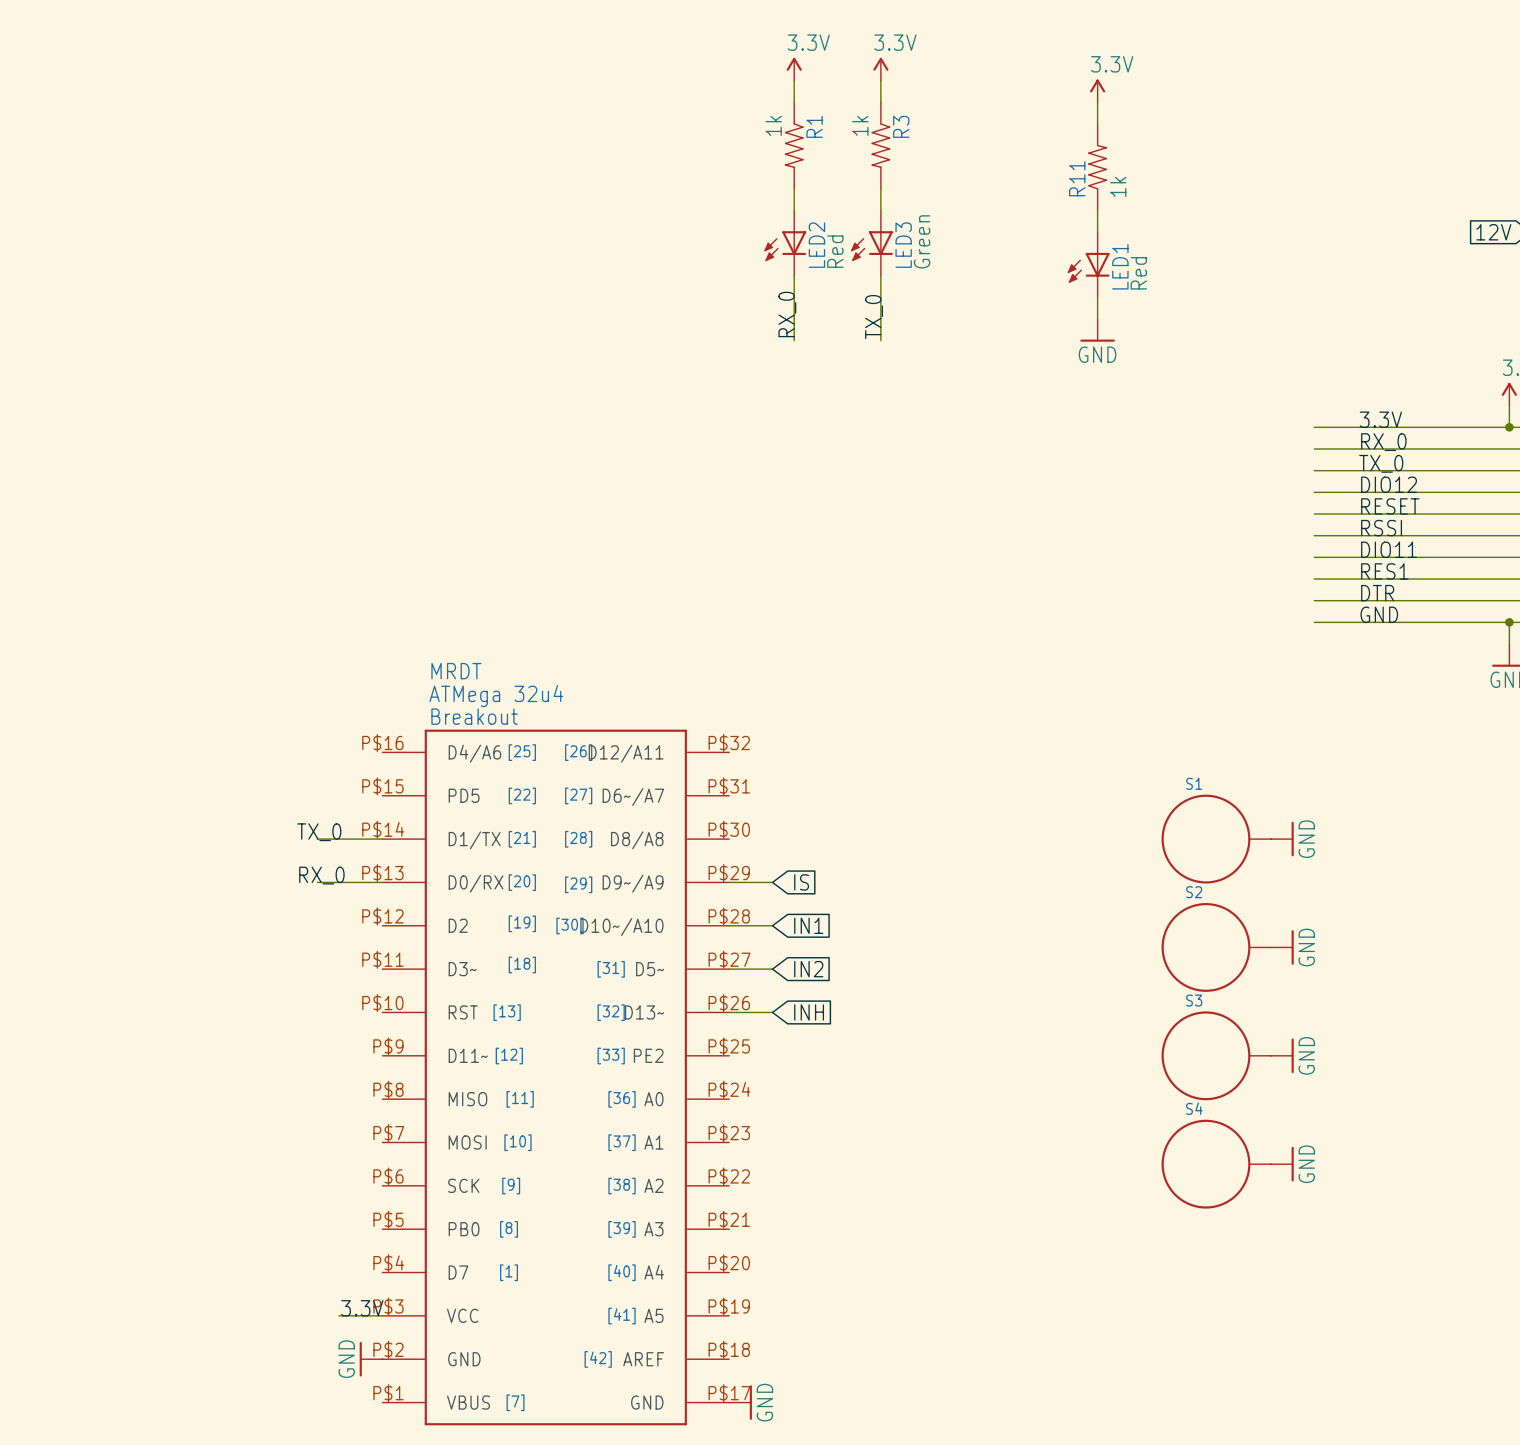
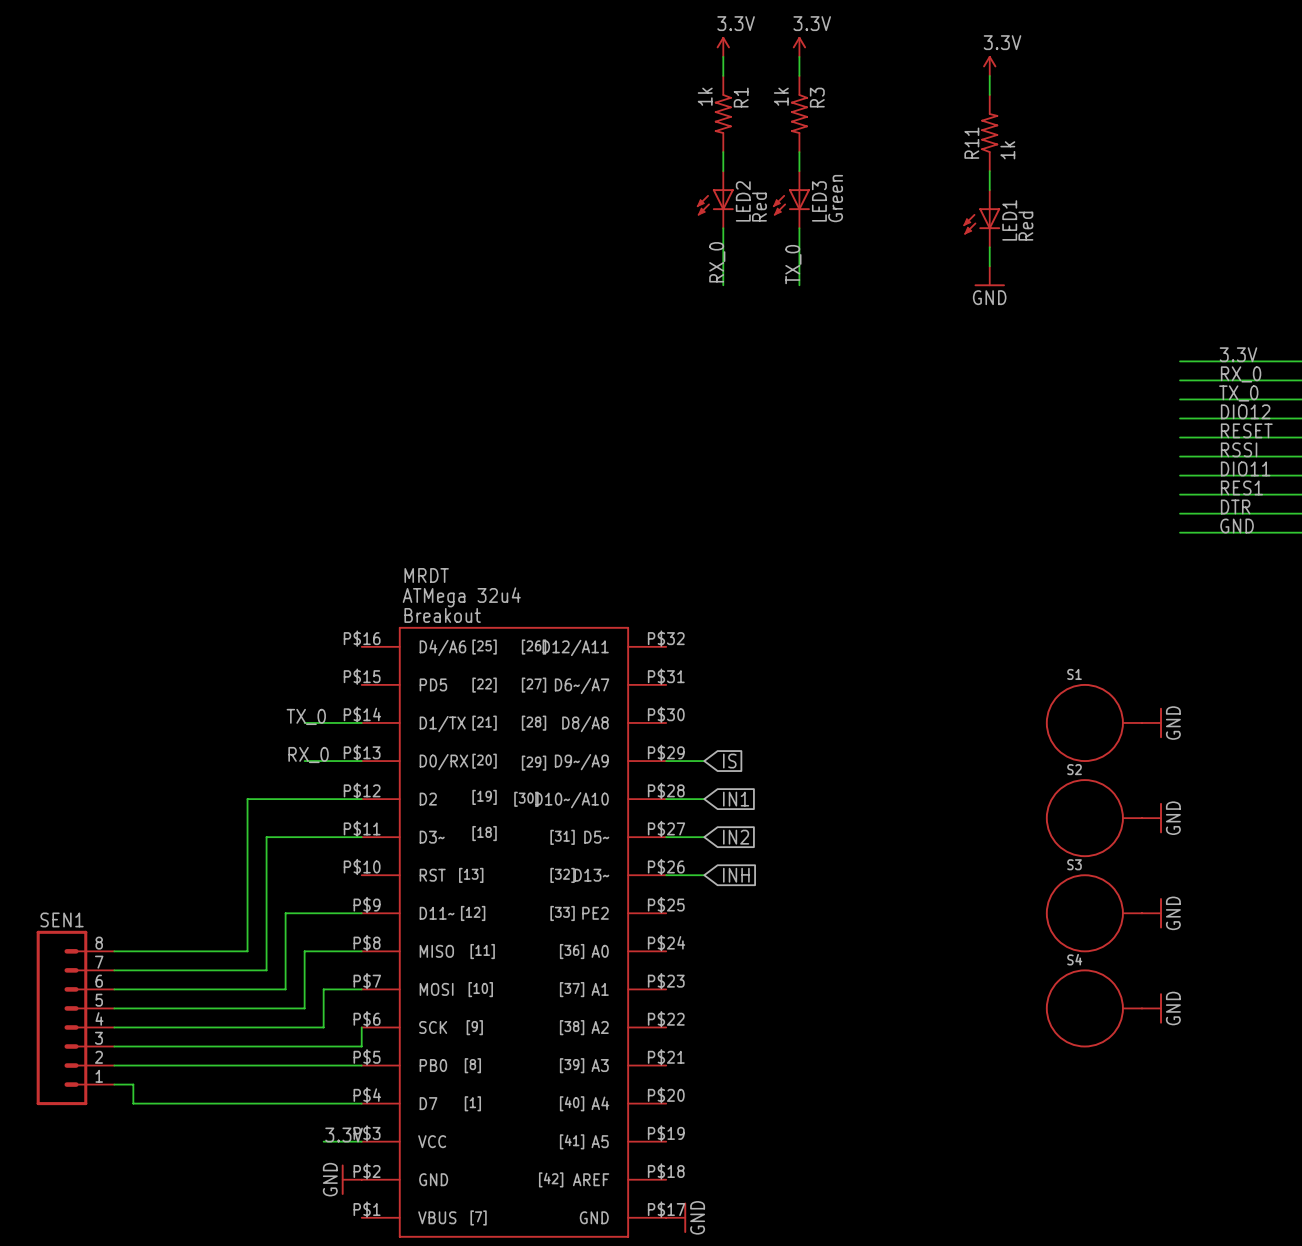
wire: none -> (361, 799) (247, 799) (247, 951) (114, 951)
wire: none -> (361, 837) (266, 837) (266, 970) (114, 970)
wire: none -> (361, 913) (285, 913) (285, 989) (114, 989)
wire: none -> (361, 951) (304, 951) (304, 1008) (114, 1008)
wire: none -> (361, 989) (323, 989) (323, 1027) (114, 1027)
SEN1: none -> (75, 1017)
wire: none -> (361, 1027) (361, 1046) (114, 1046)
wire: none -> (114, 1065) (361, 1065)
wire: none -> (114, 1084) (133, 1084) (133, 1103) (361, 1103)

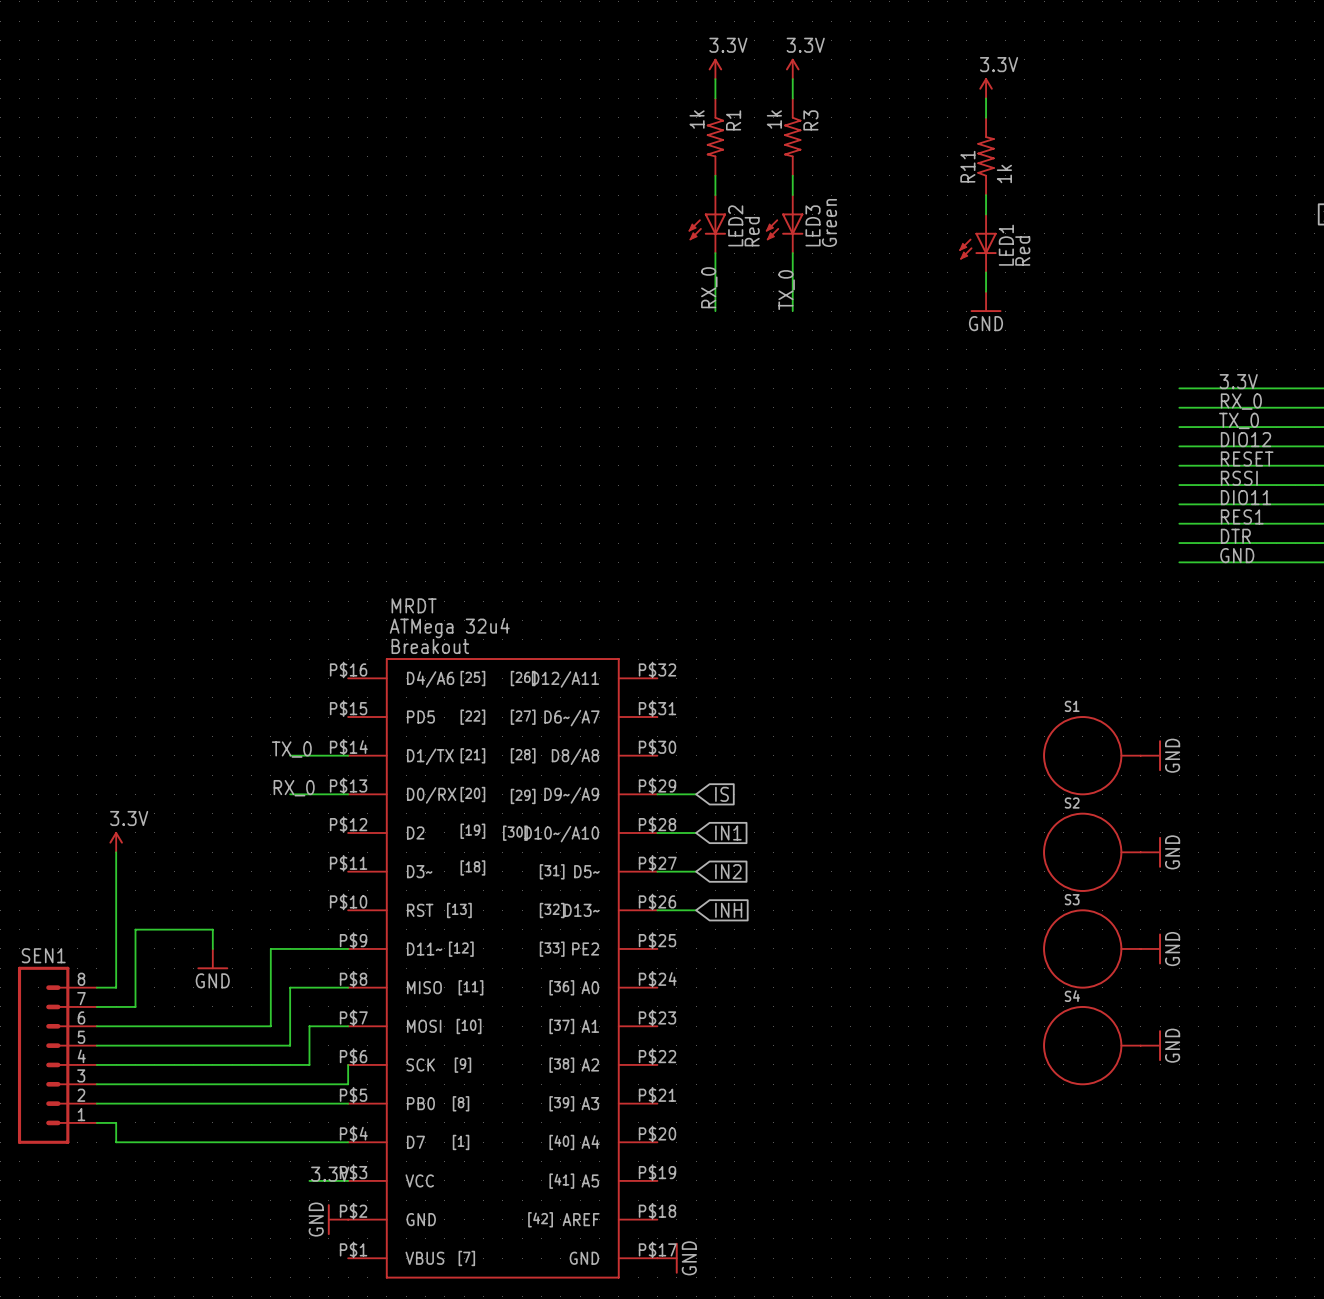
wire: (361, 799) (247, 799) (247, 951) (133, 951) -> (116, 852) (116, 987)
power symbol: none -> 3.3V (116, 842)
wire: (361, 837) (266, 837) (266, 970) (152, 970) -> (212, 948) (212, 929) (135, 929) (135, 1006)
power symbol: none -> GND (212, 959)

